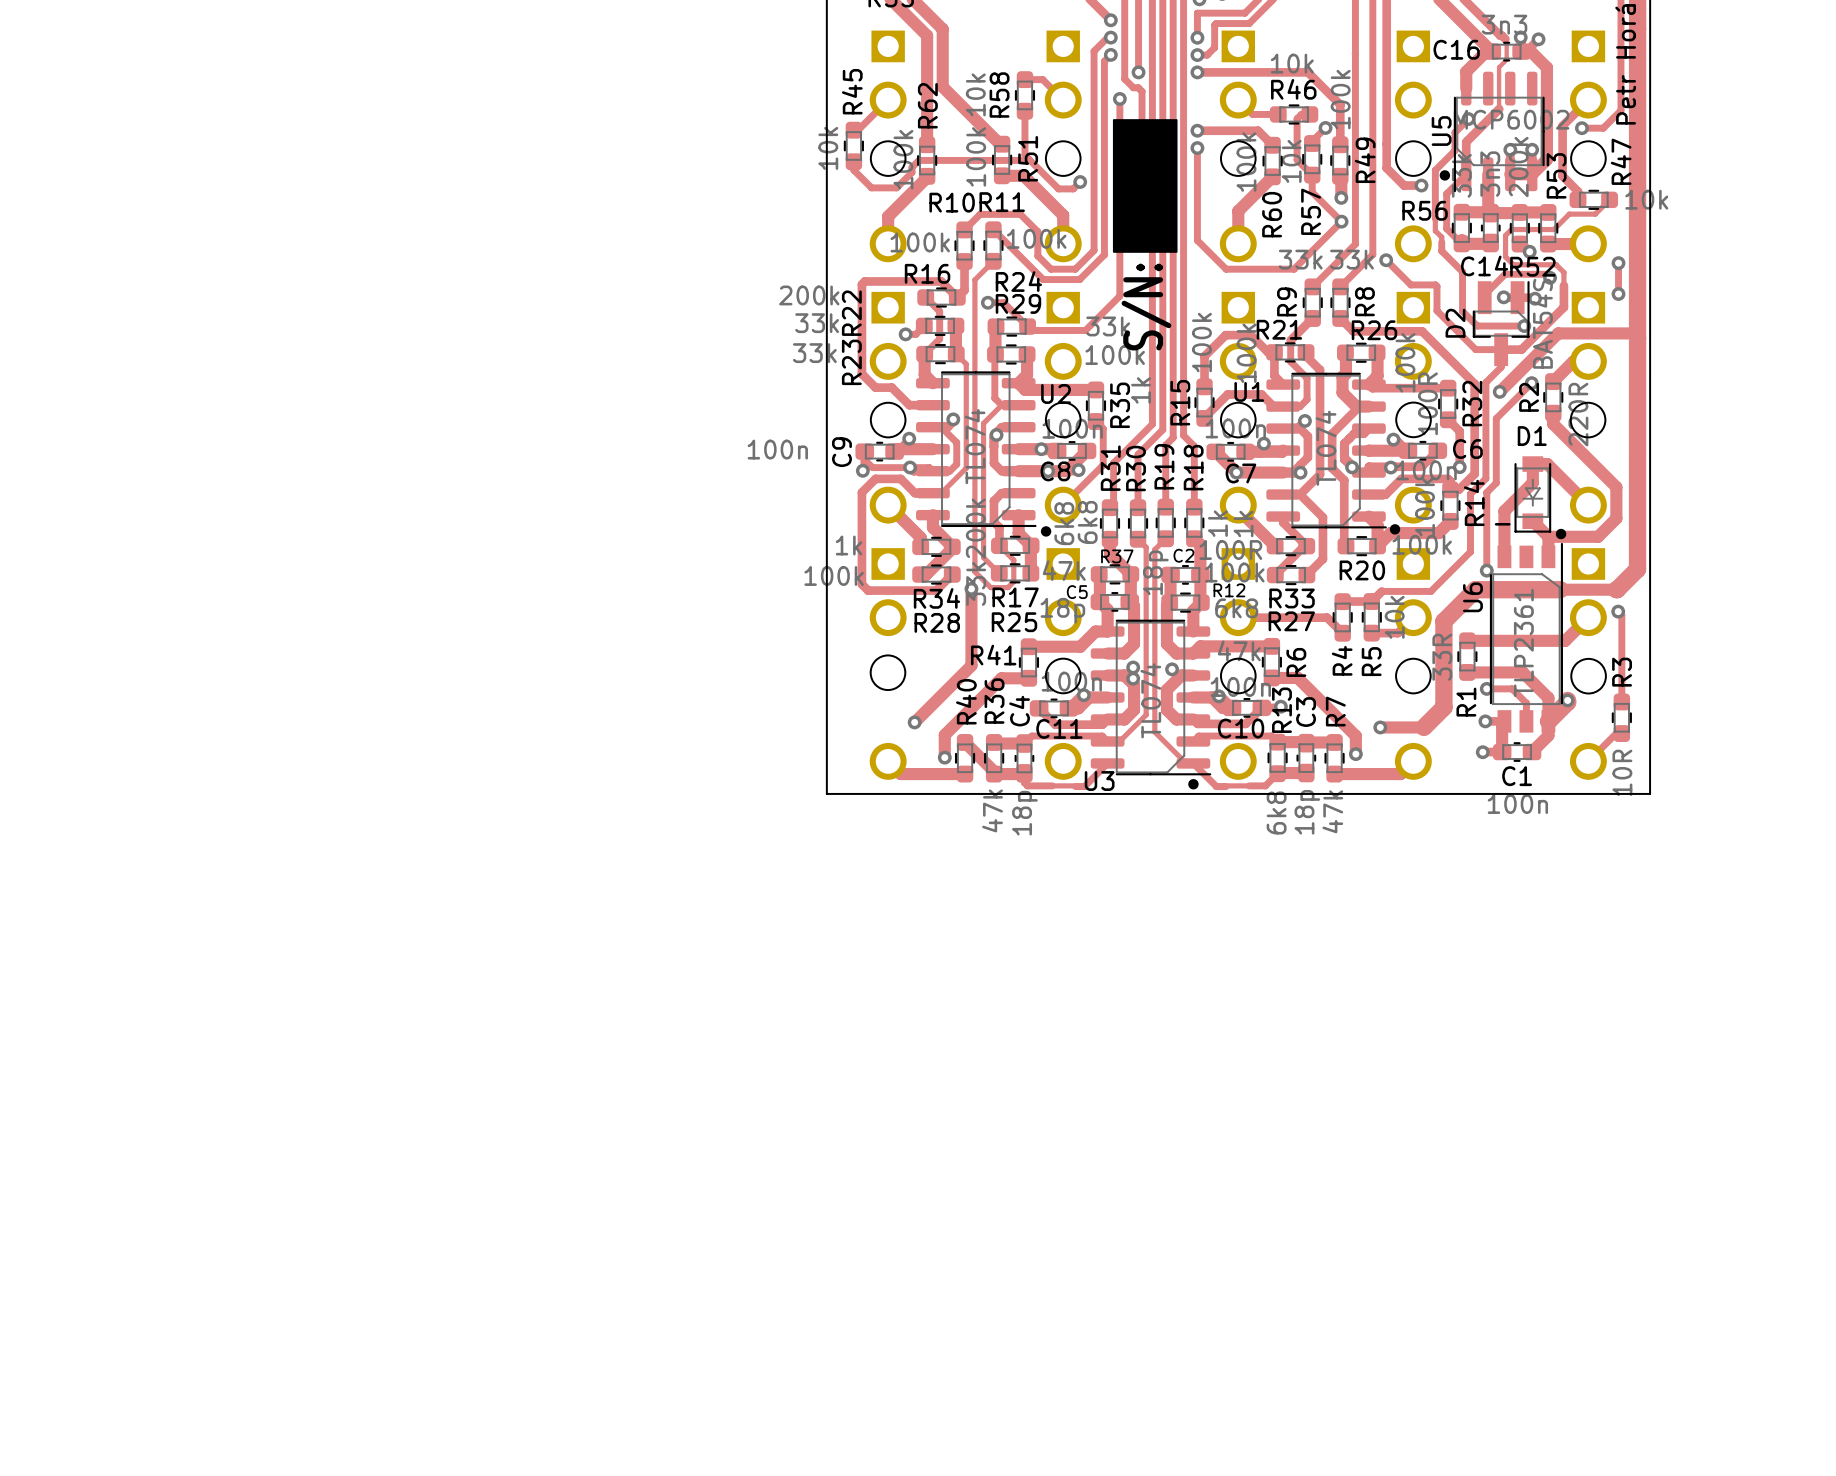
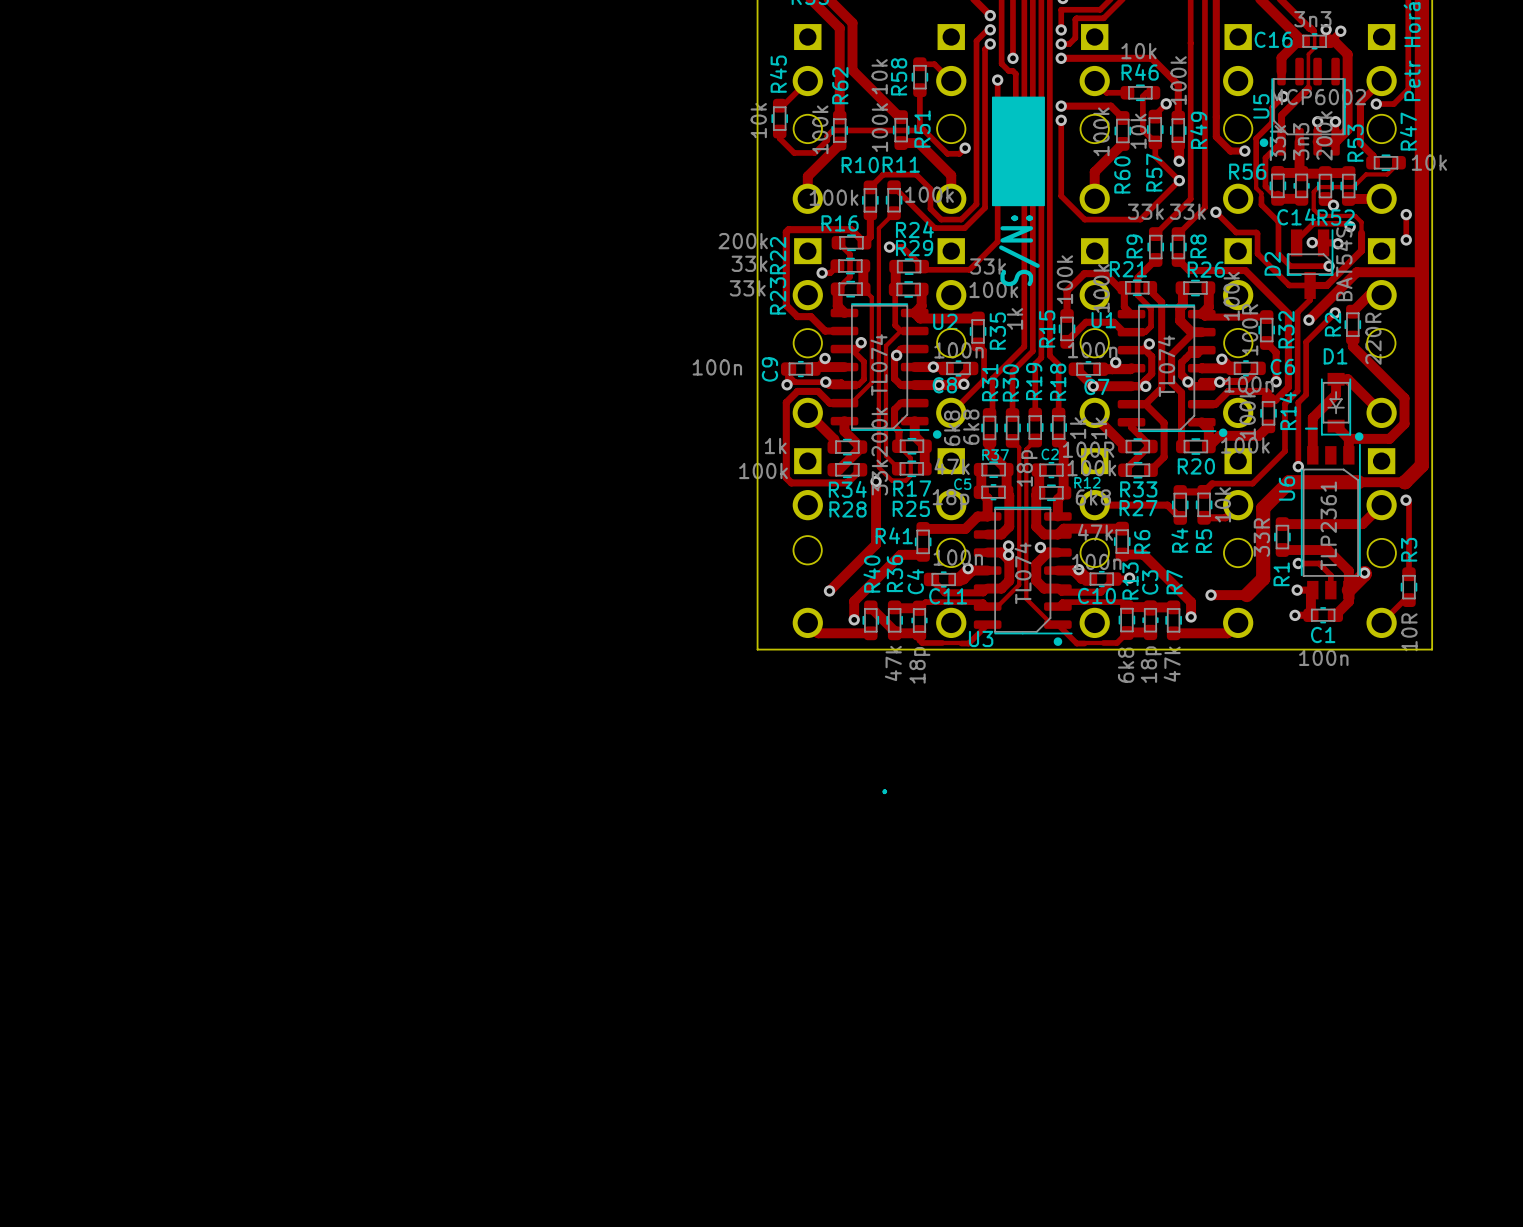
text: none -> . (884, 791)

